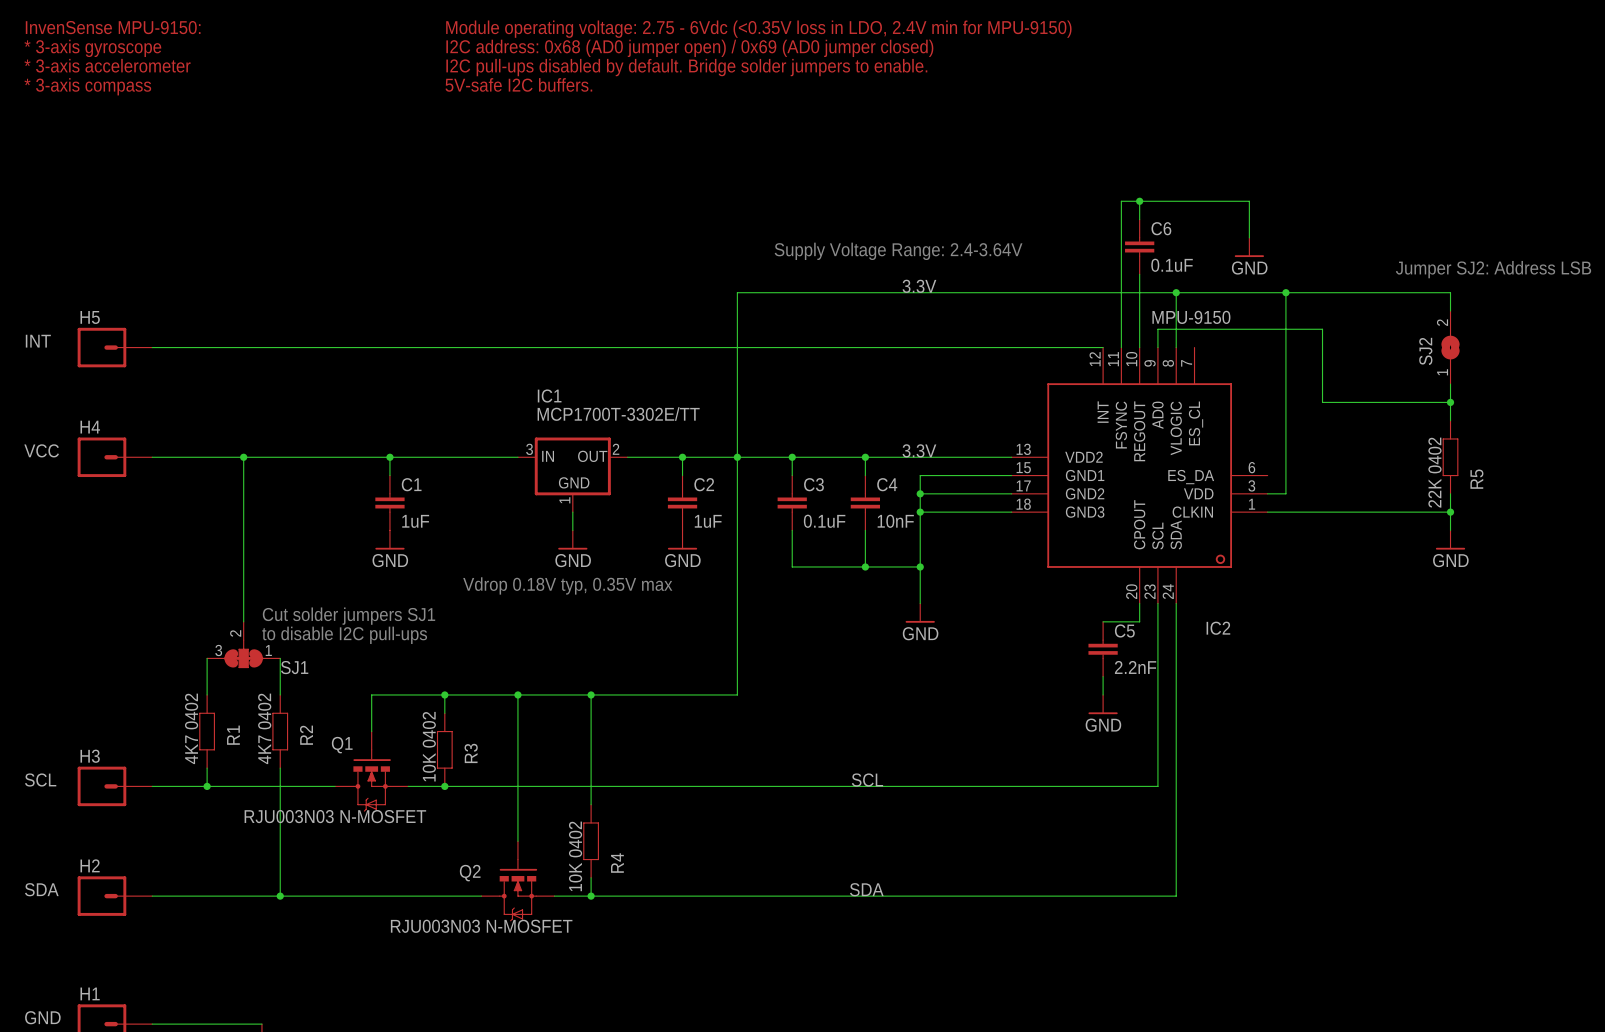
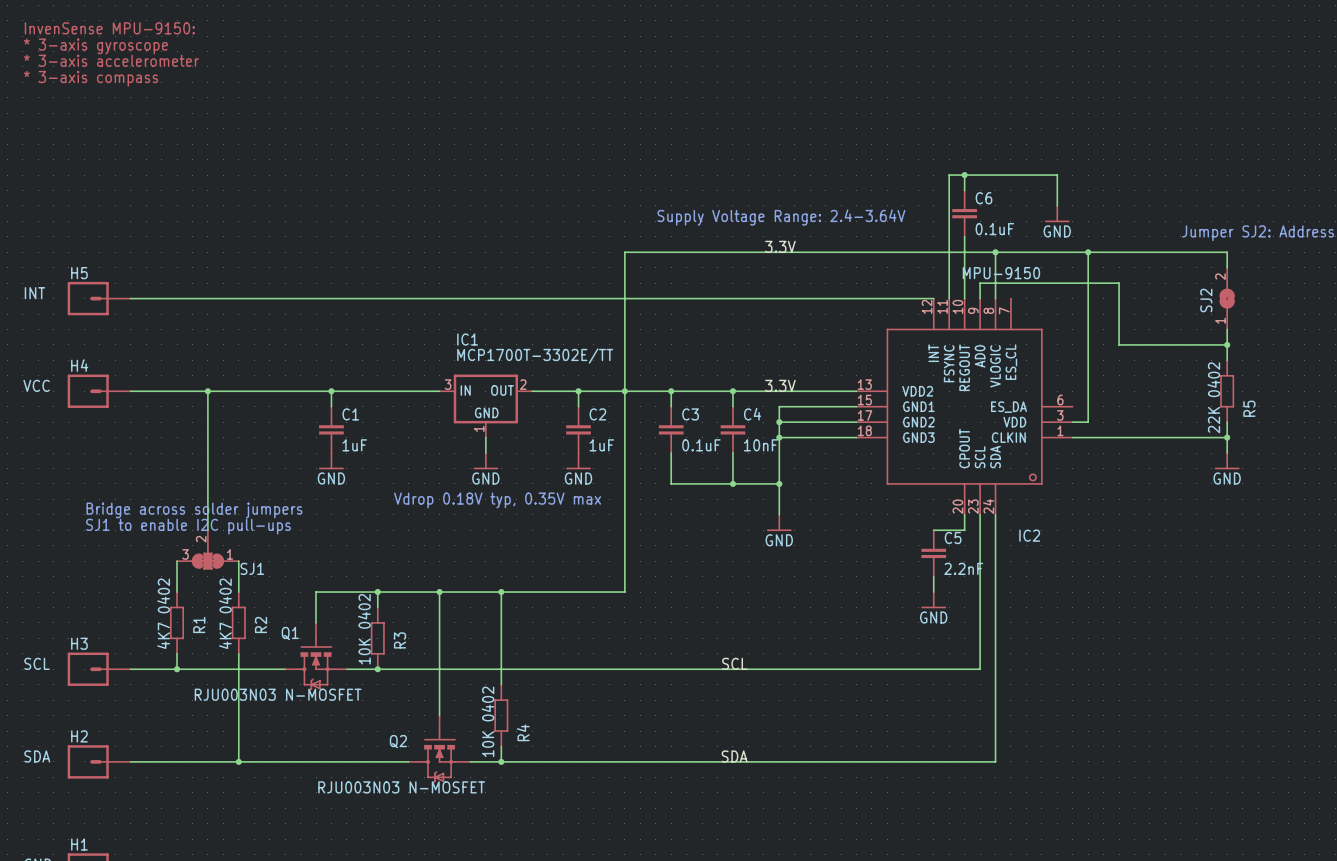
text: Module operating voltage: 2.75 - 6Vdc (<0.35V loss in LDO, 2.4V min for MPU-9150) (758, 29) -> none
text: I2C address: 0x68 (AD0 jumper open) / 0x69 (AD0 jumper closed) (689, 48) -> none
text: I2C pull-ups disabled by default. Bridge solder jumpers to enable. (686, 67) -> none
text: 5V-safe I2C buffers. (518, 84) -> none
text: none -> Bridge across solder jumpers (194, 510)
text: Cut solder jumpers SJ1 (348, 616) -> none
text: to disable I2C pull-ups (344, 635) -> SJ1 to enable I2C pull-ups (188, 526)

